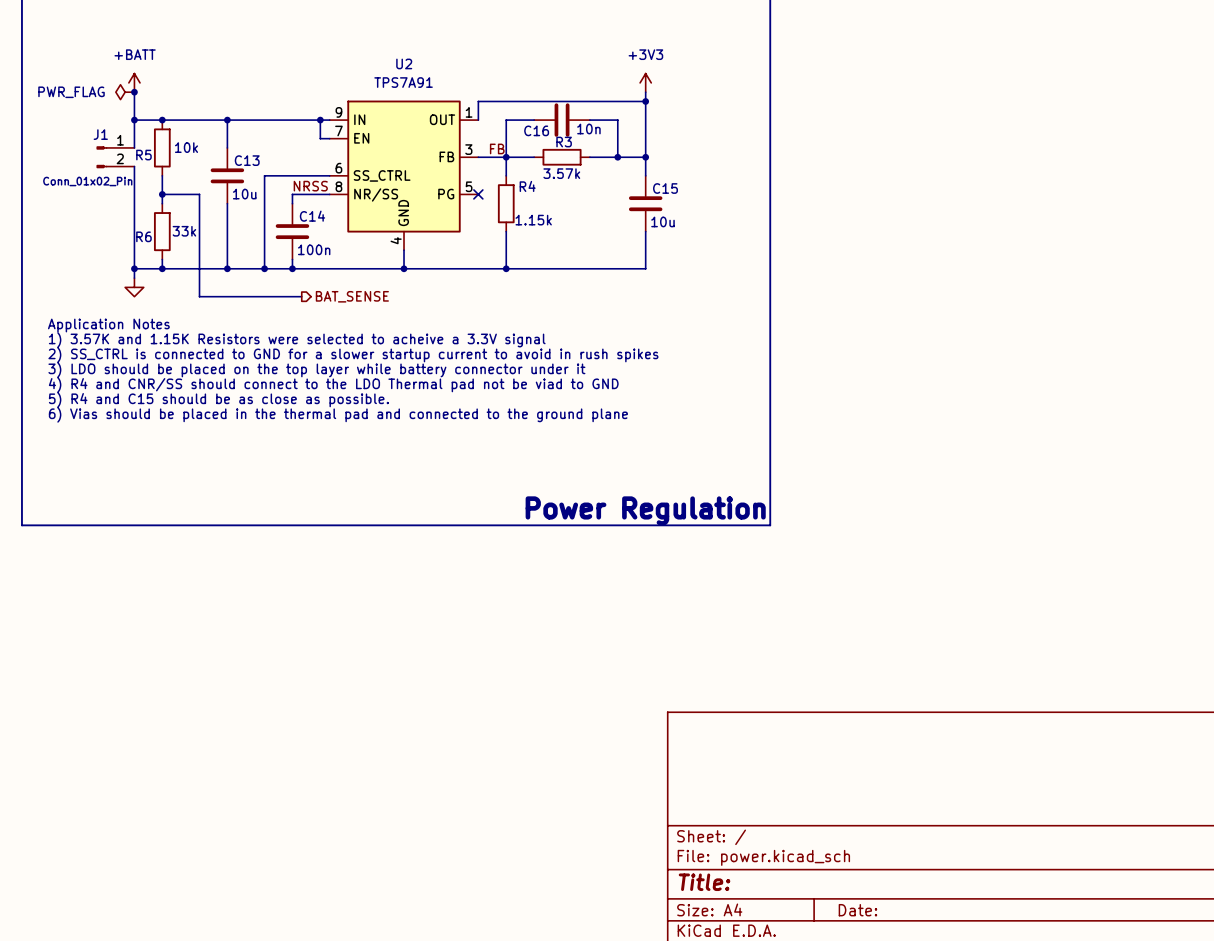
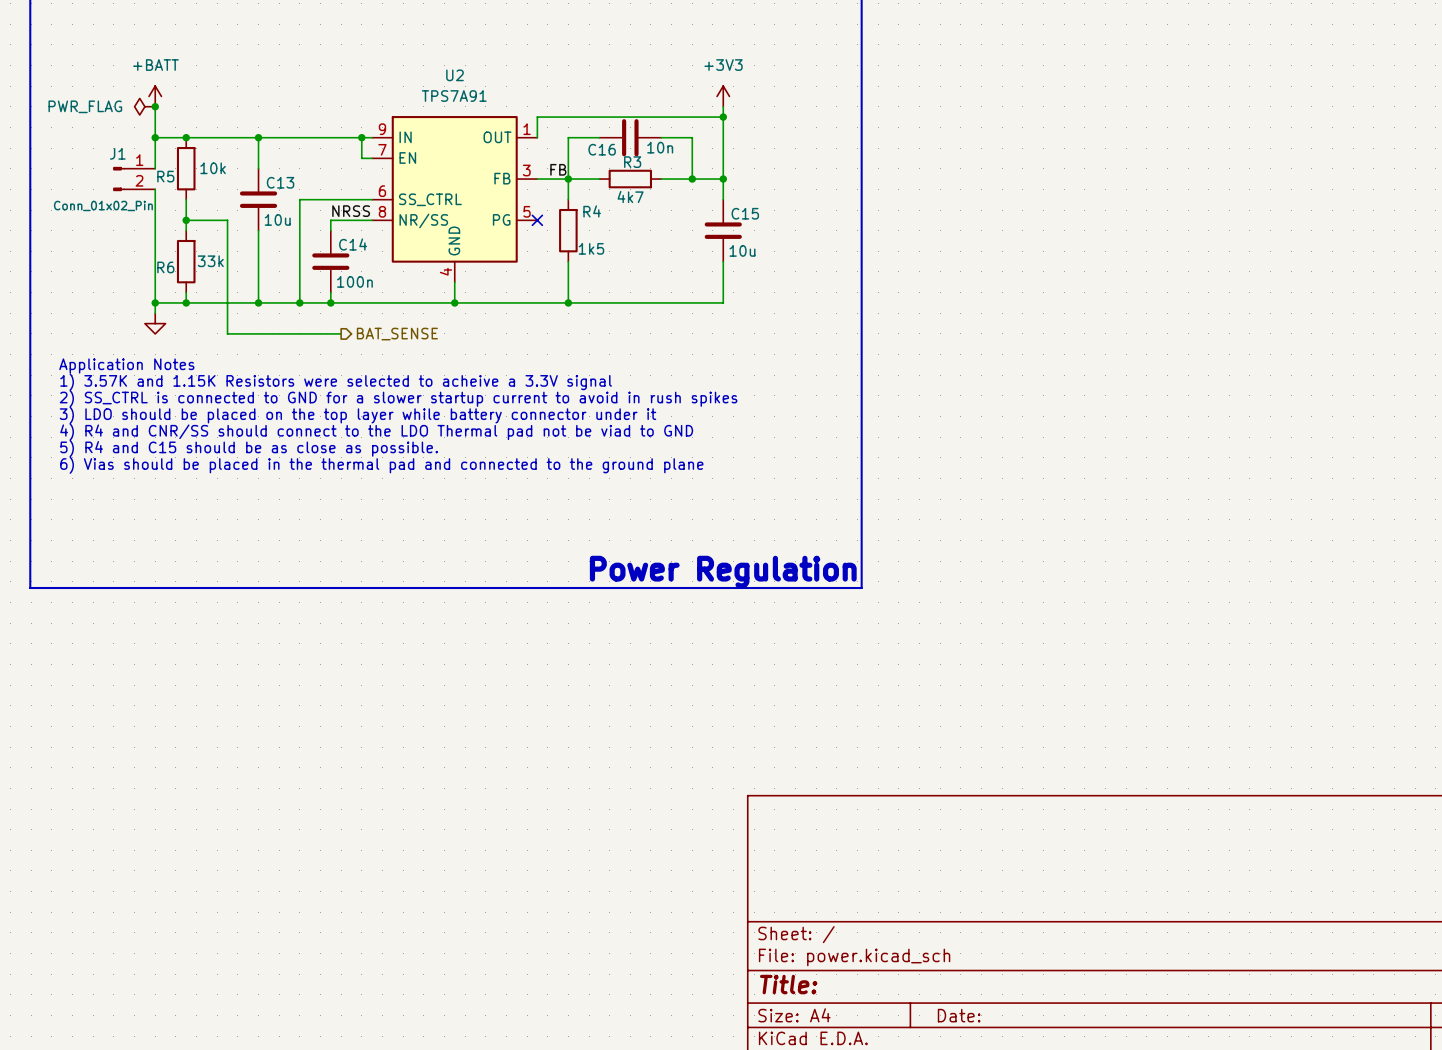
R3 value: 3.57k (561, 173) -> 4k7 (630, 196)
R4 value: 1.15k (533, 220) -> 1k5 (591, 248)

